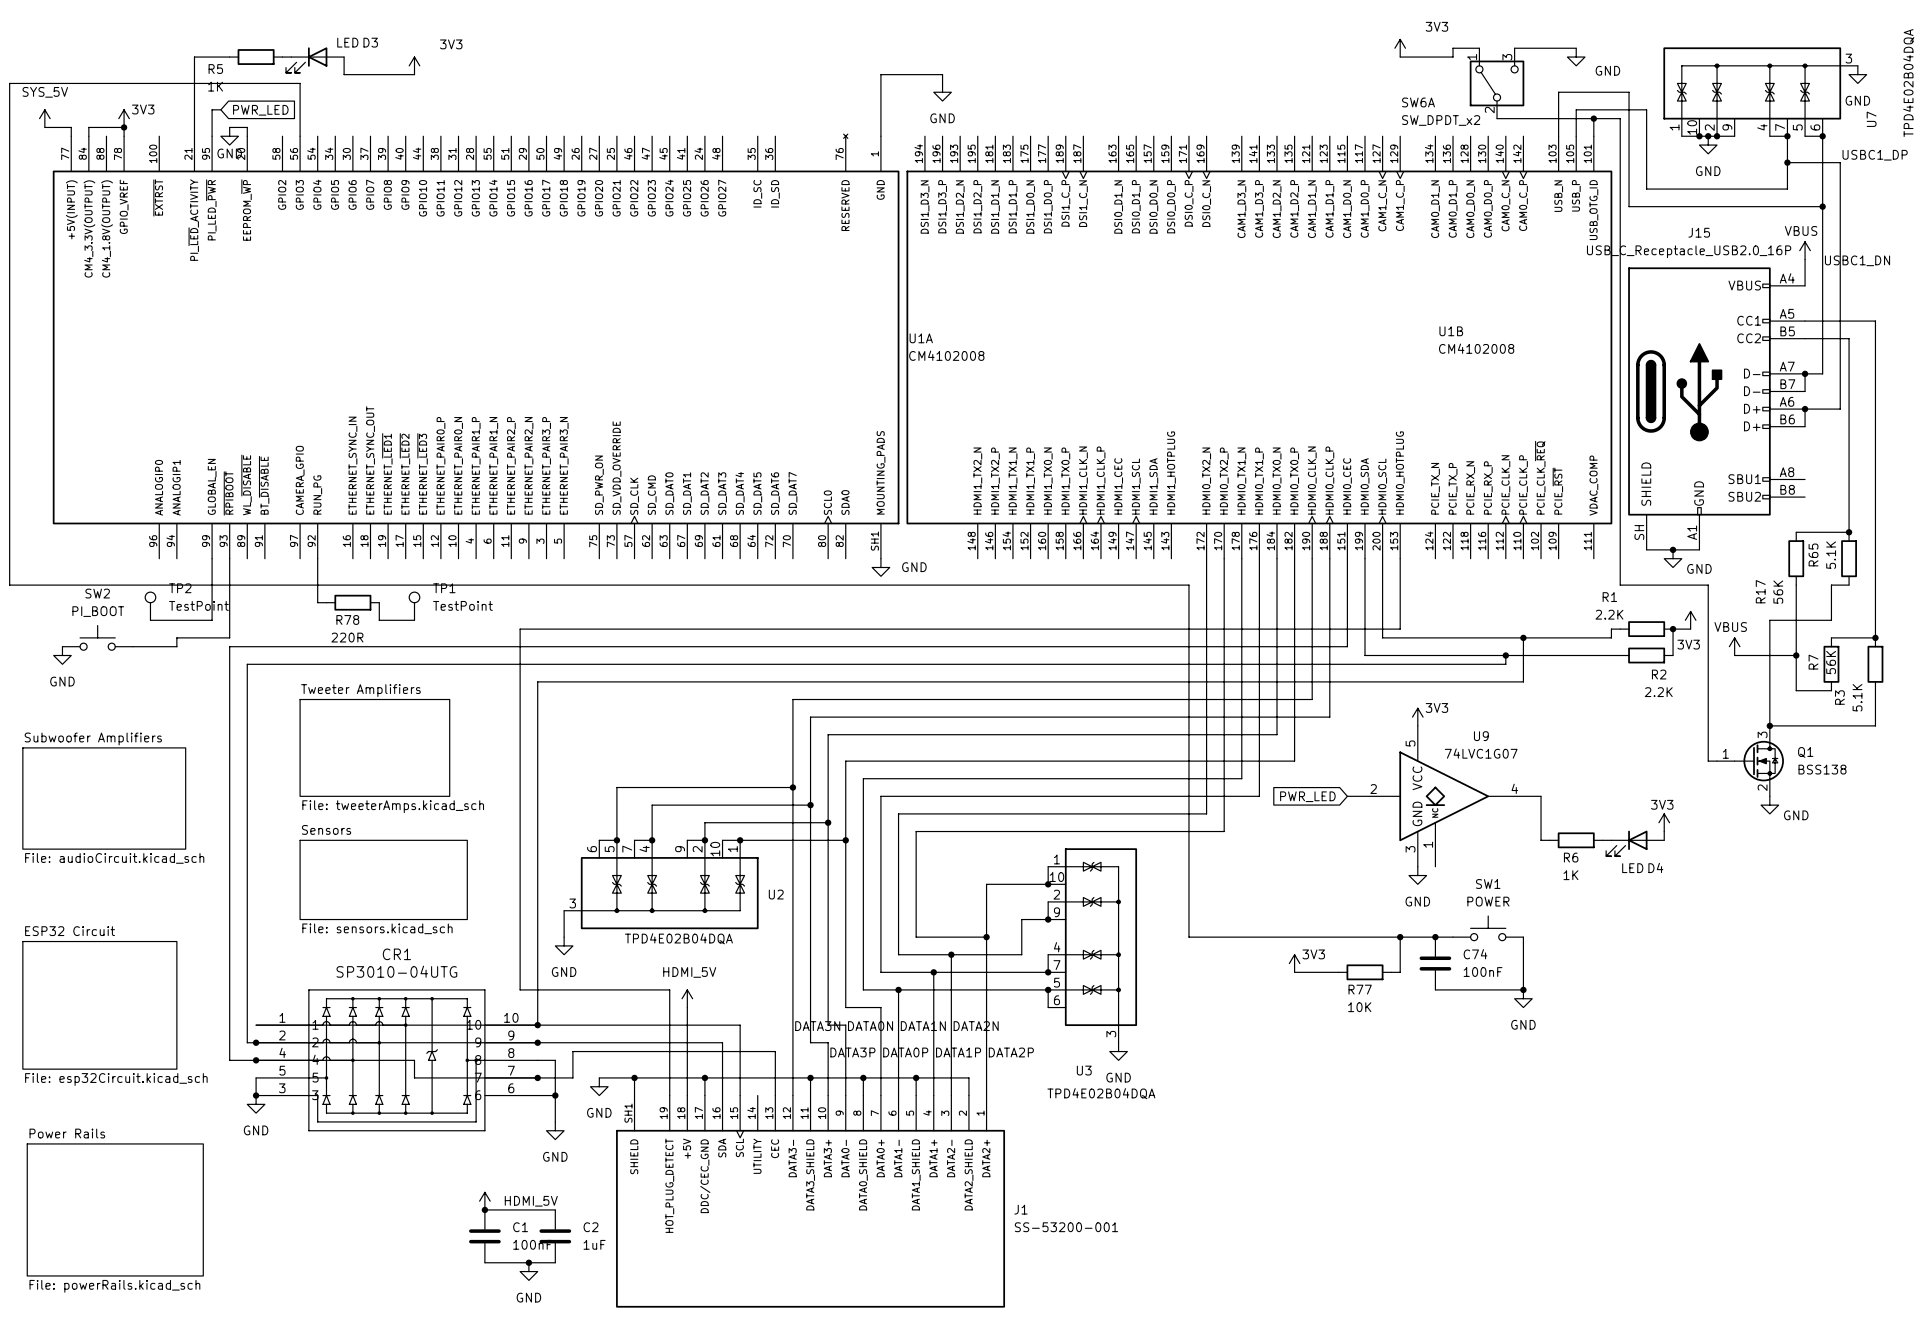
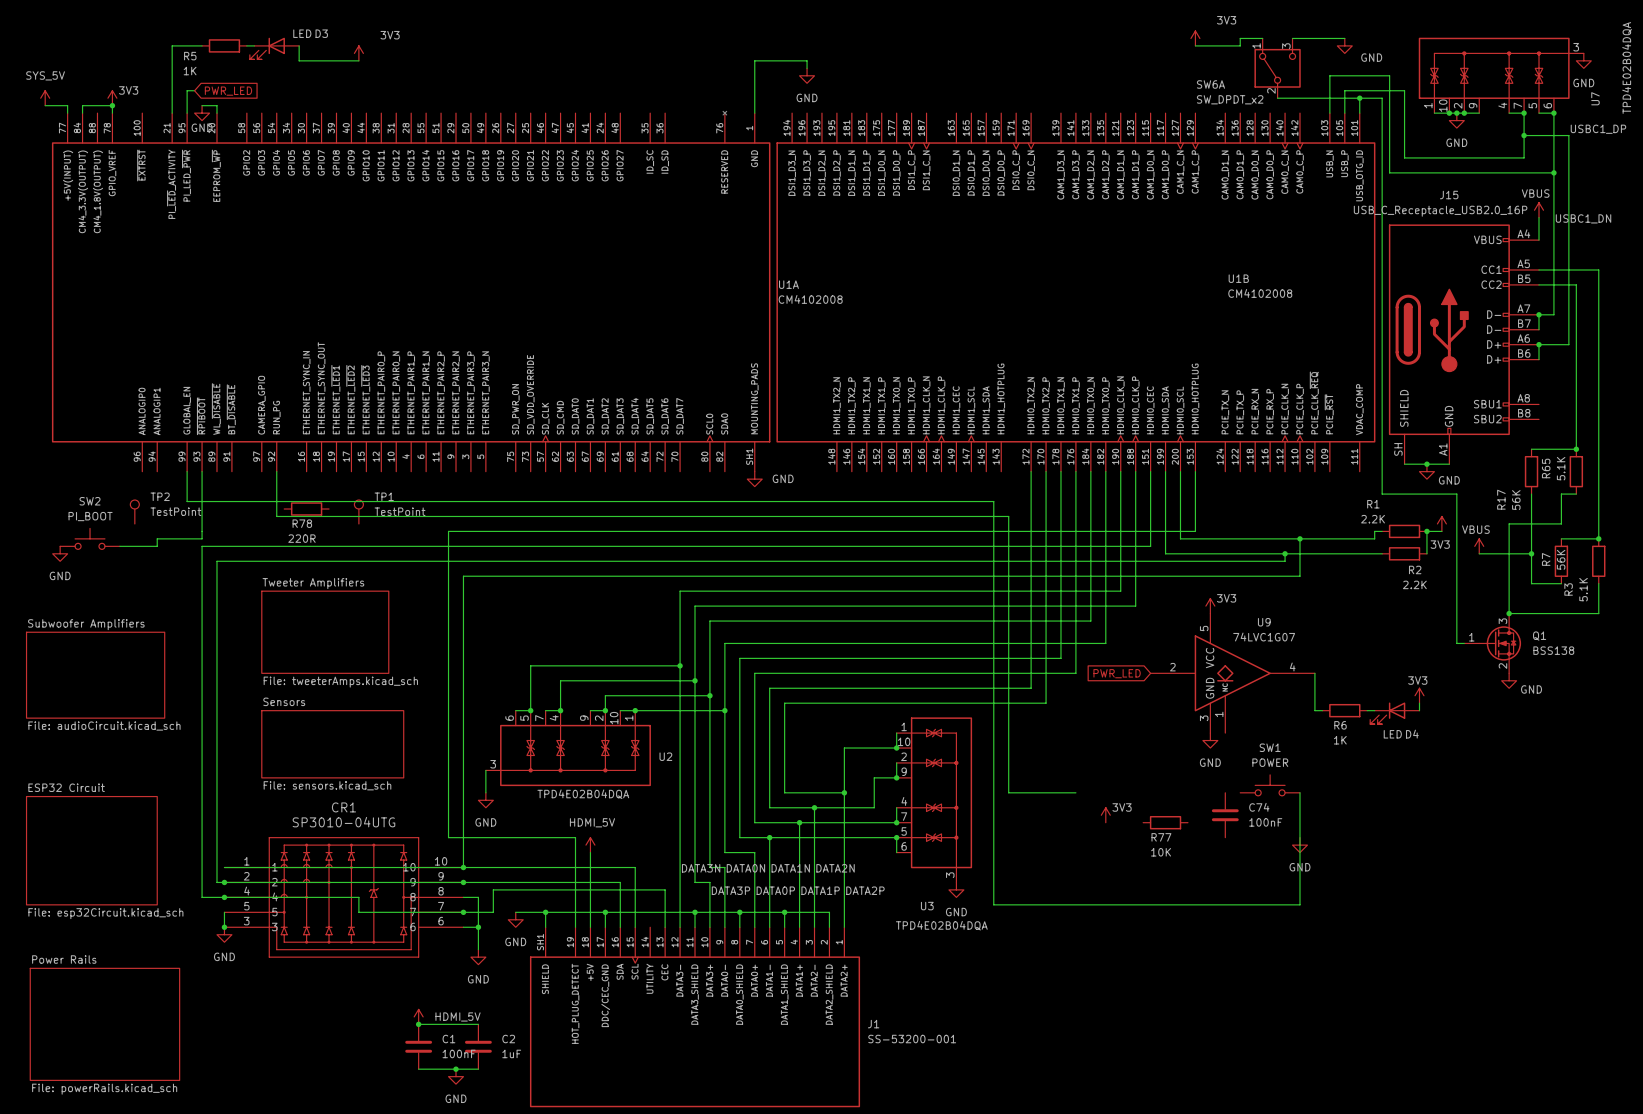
wire: (300, 136) (300, 83) (9, 83) (9, 585) (1188, 585) (1188, 937) -> (276, 509) (276, 516) (1008, 516) (1008, 792) (1016, 792)
wire: (212, 593) (212, 620) (150, 620) -> none
wire: (317, 602) (326, 602) -> none
wire: (379, 602) (379, 620) (414, 620) -> none
wire: (1259, 937) (1453, 937) -> none
wire: (1400, 937) (1400, 972) (1391, 972) -> none
junction: (1400, 937) -> none
junction: (1435, 937) -> none
wire: (1294, 972) (1338, 972) -> none
wire: (1435, 989) (1523, 989) -> (187, 501) (993, 501) (993, 904) (1299, 904) (1299, 837)
junction: (1523, 989) -> none

